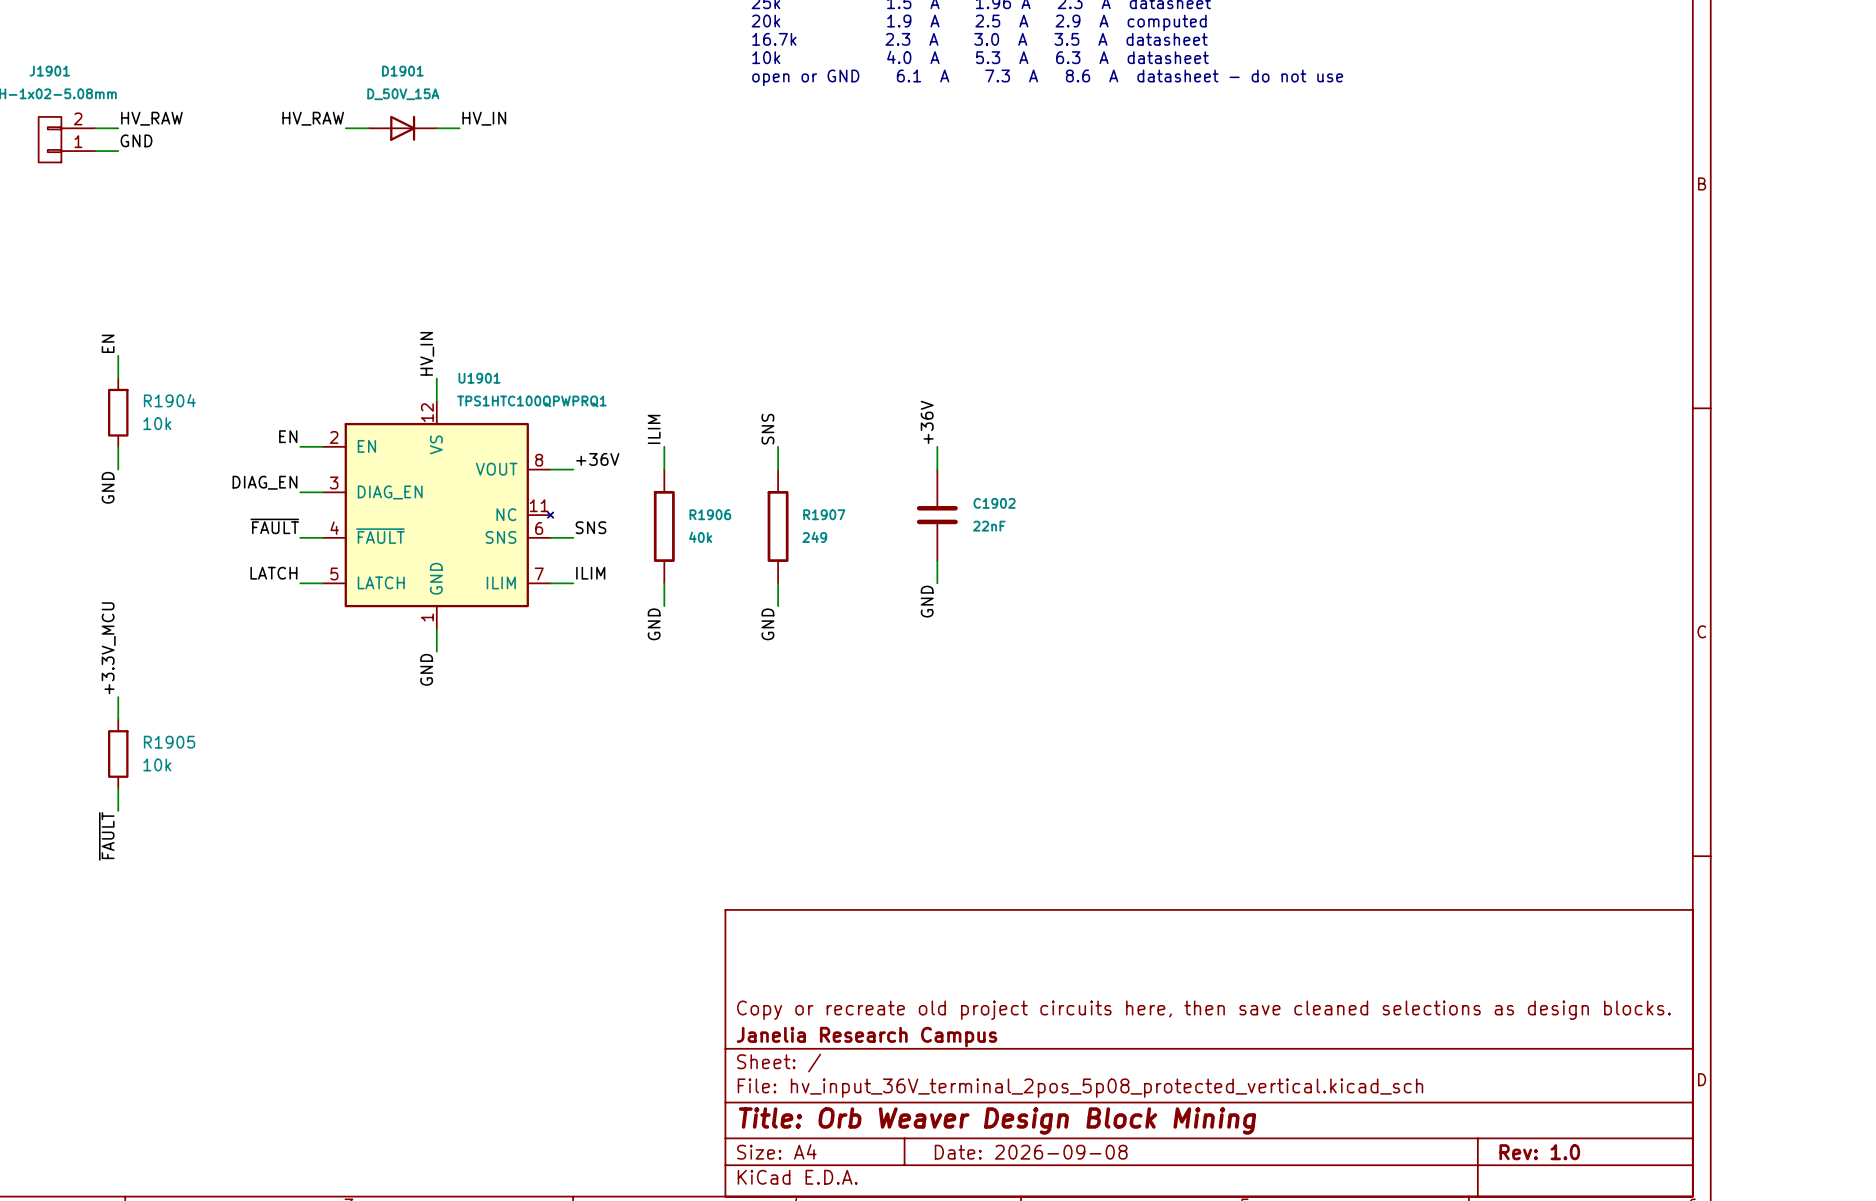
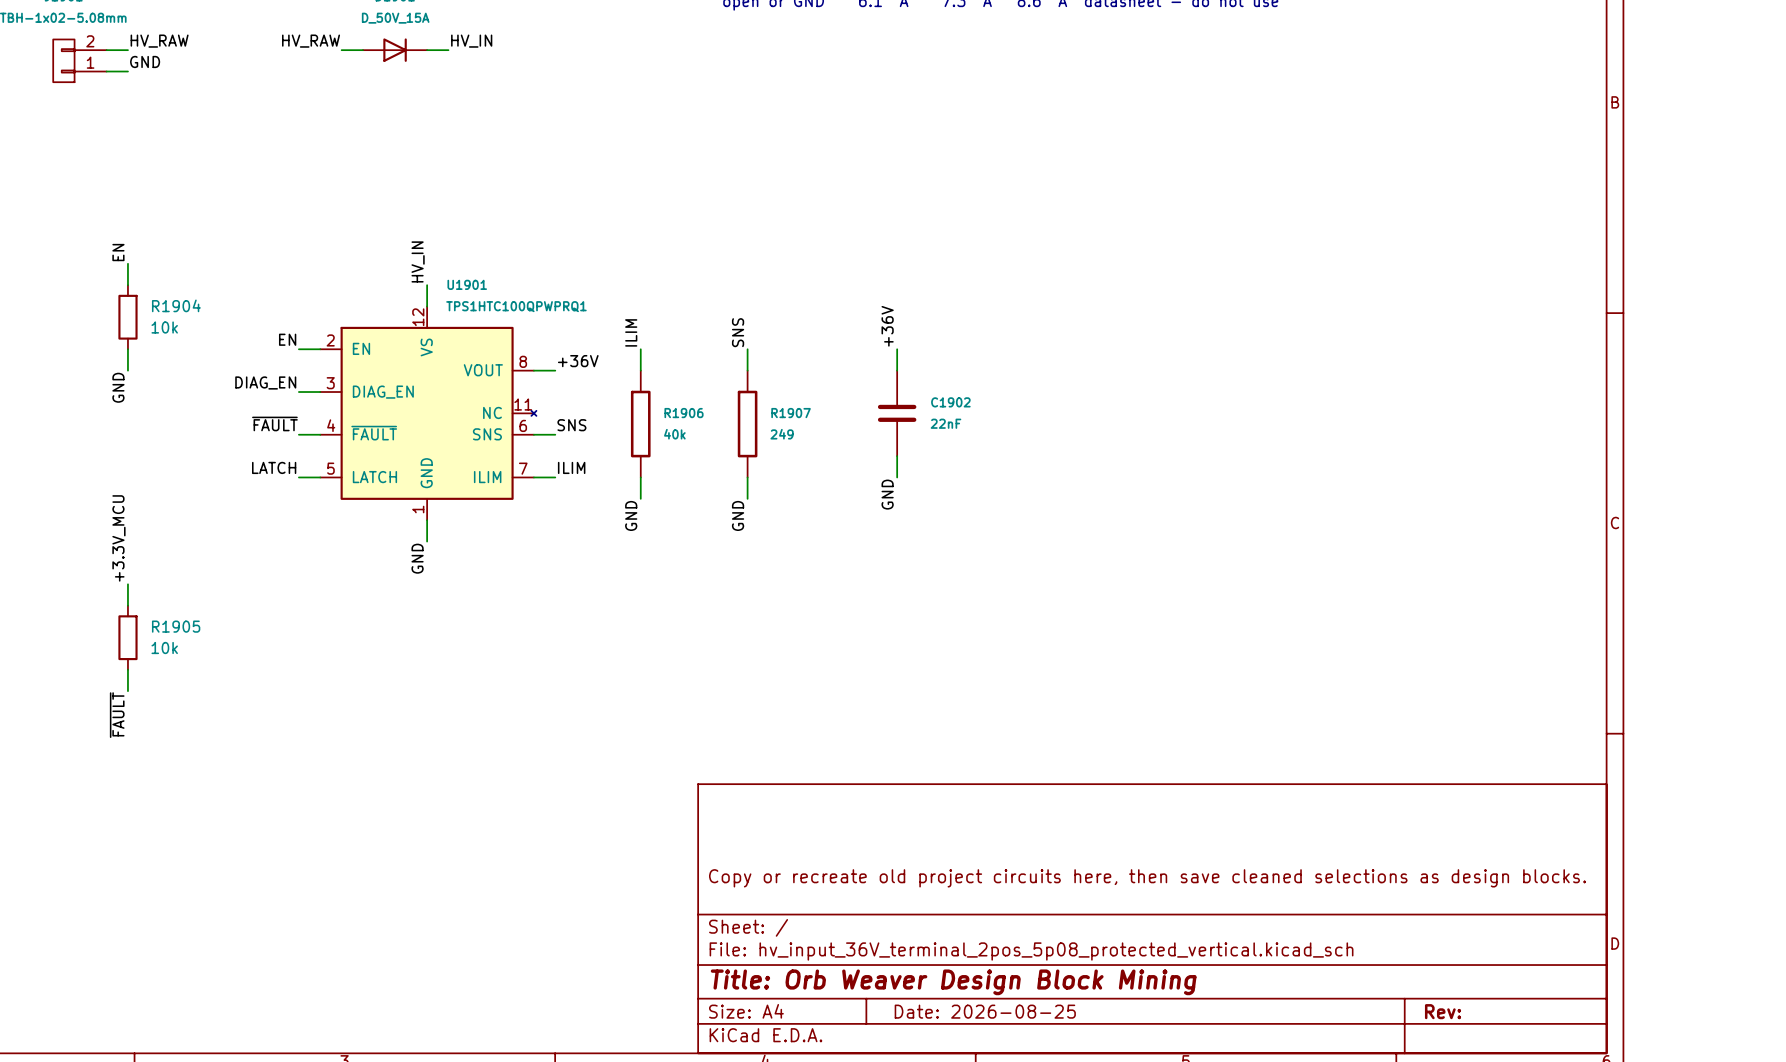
title block: Janelia Research Campus (866, 1037) -> none
title block: Date: 2026-09-08 (1031, 1152) -> Date: 2026-08-25 (985, 1011)
title block: Rev: 1.0 (1539, 1152) -> Rev: (1443, 1011)

